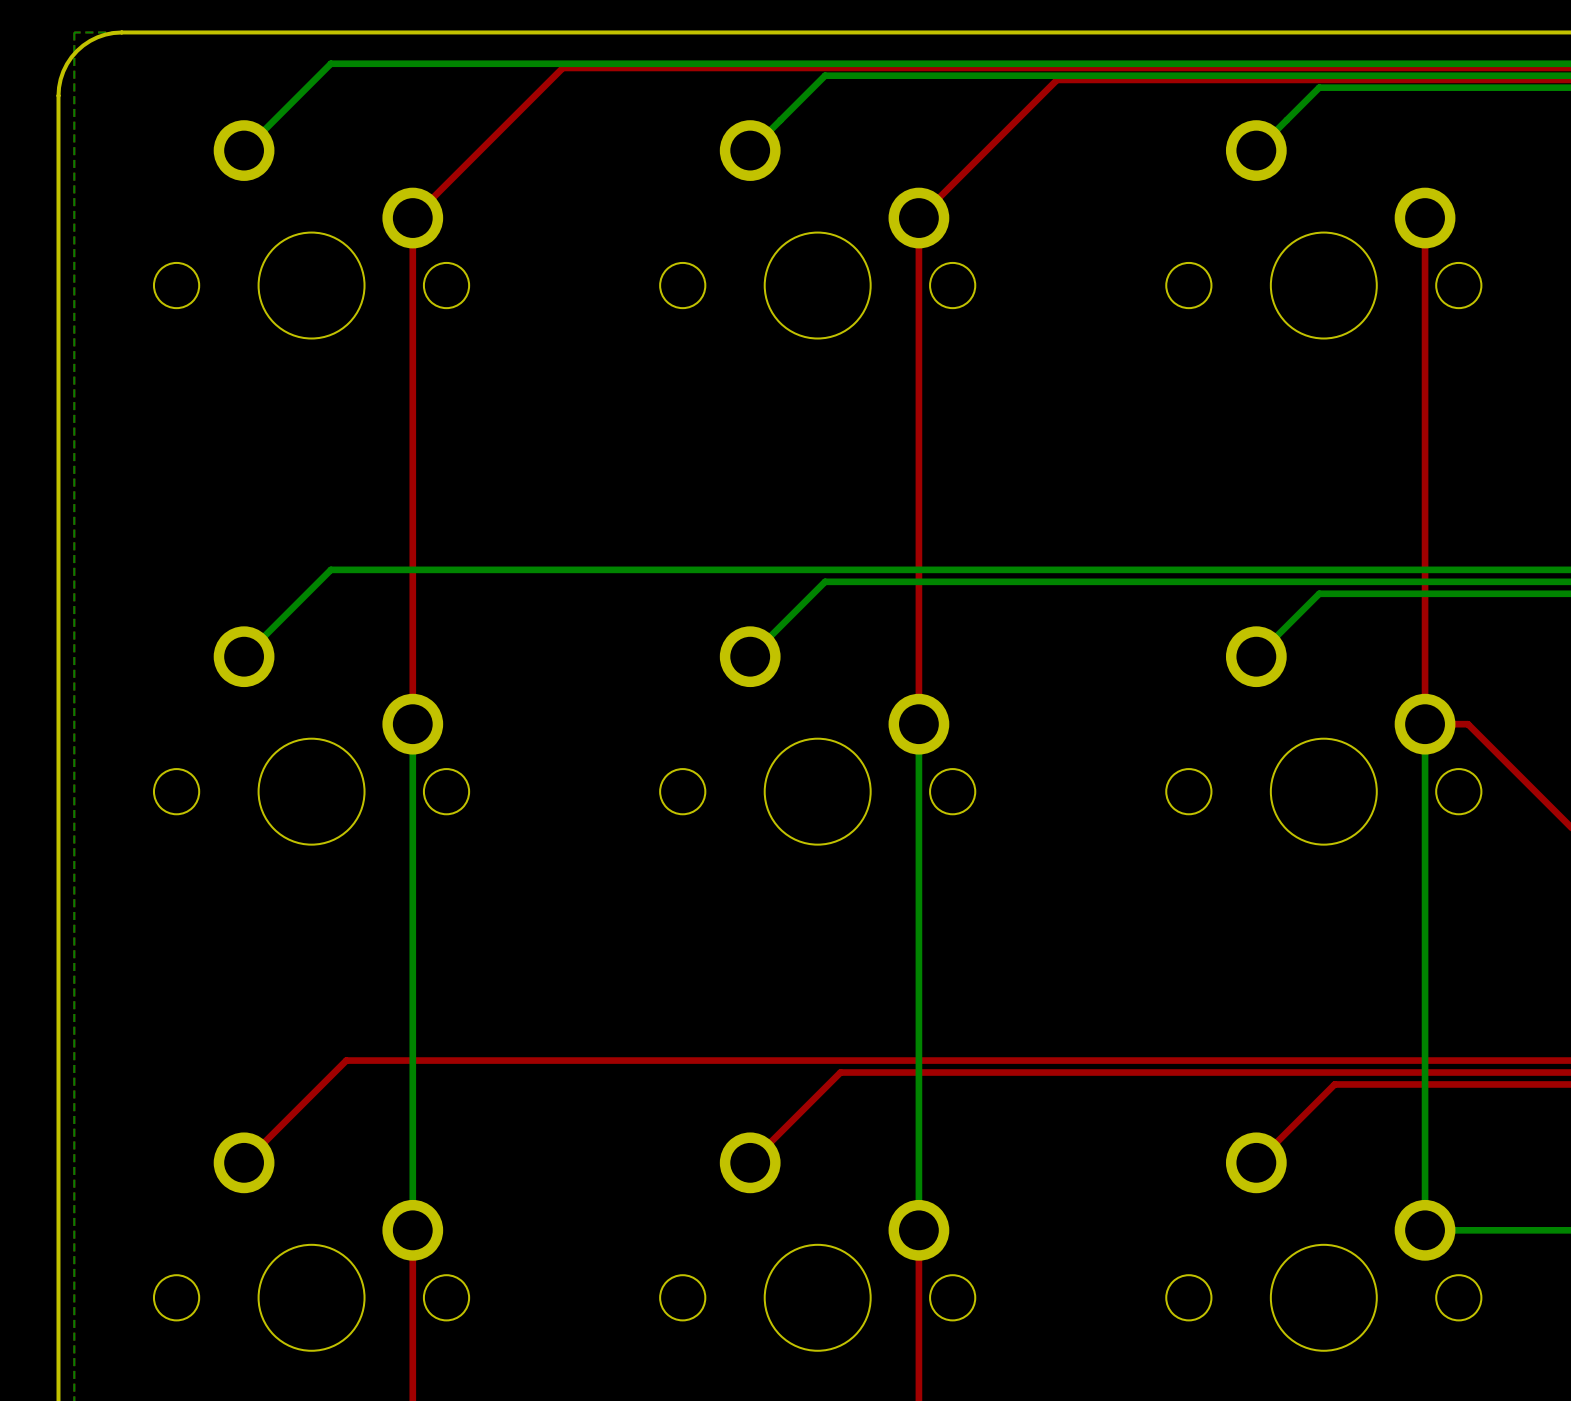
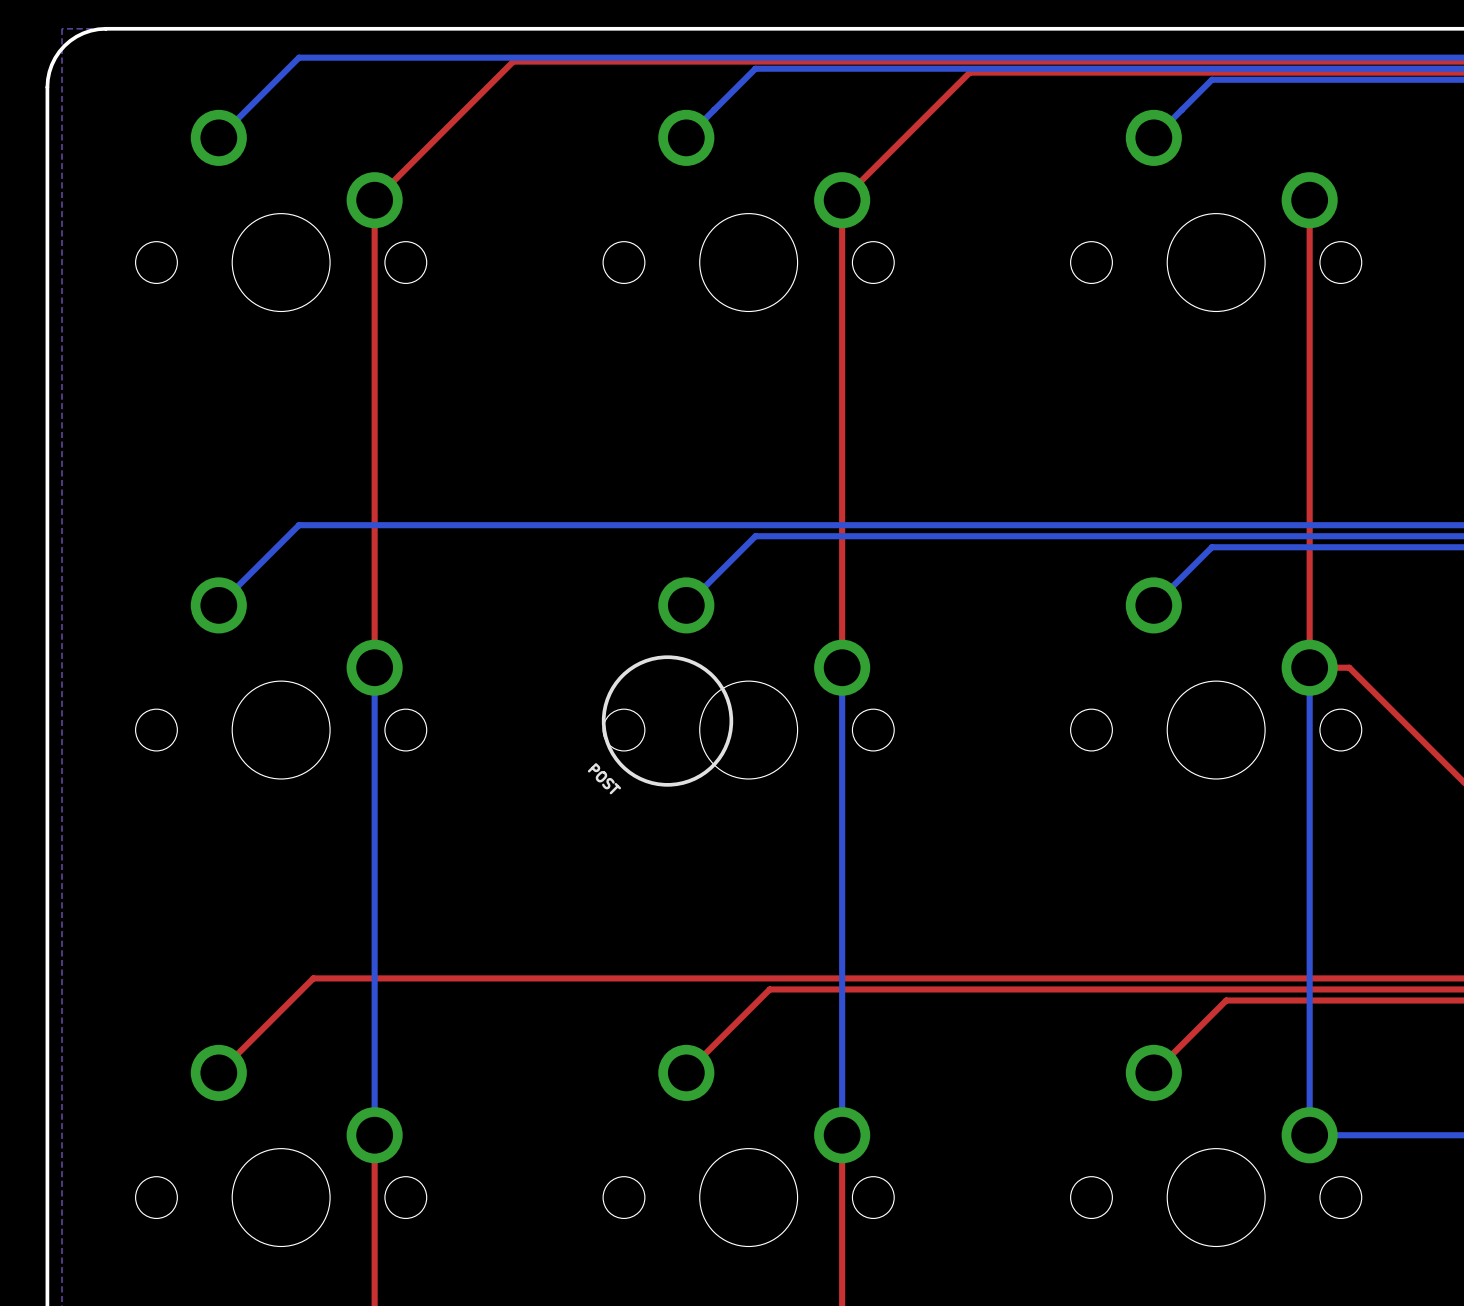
drawing: none -> [601, 655, 734, 787]
text: none -> POST (604, 778)

